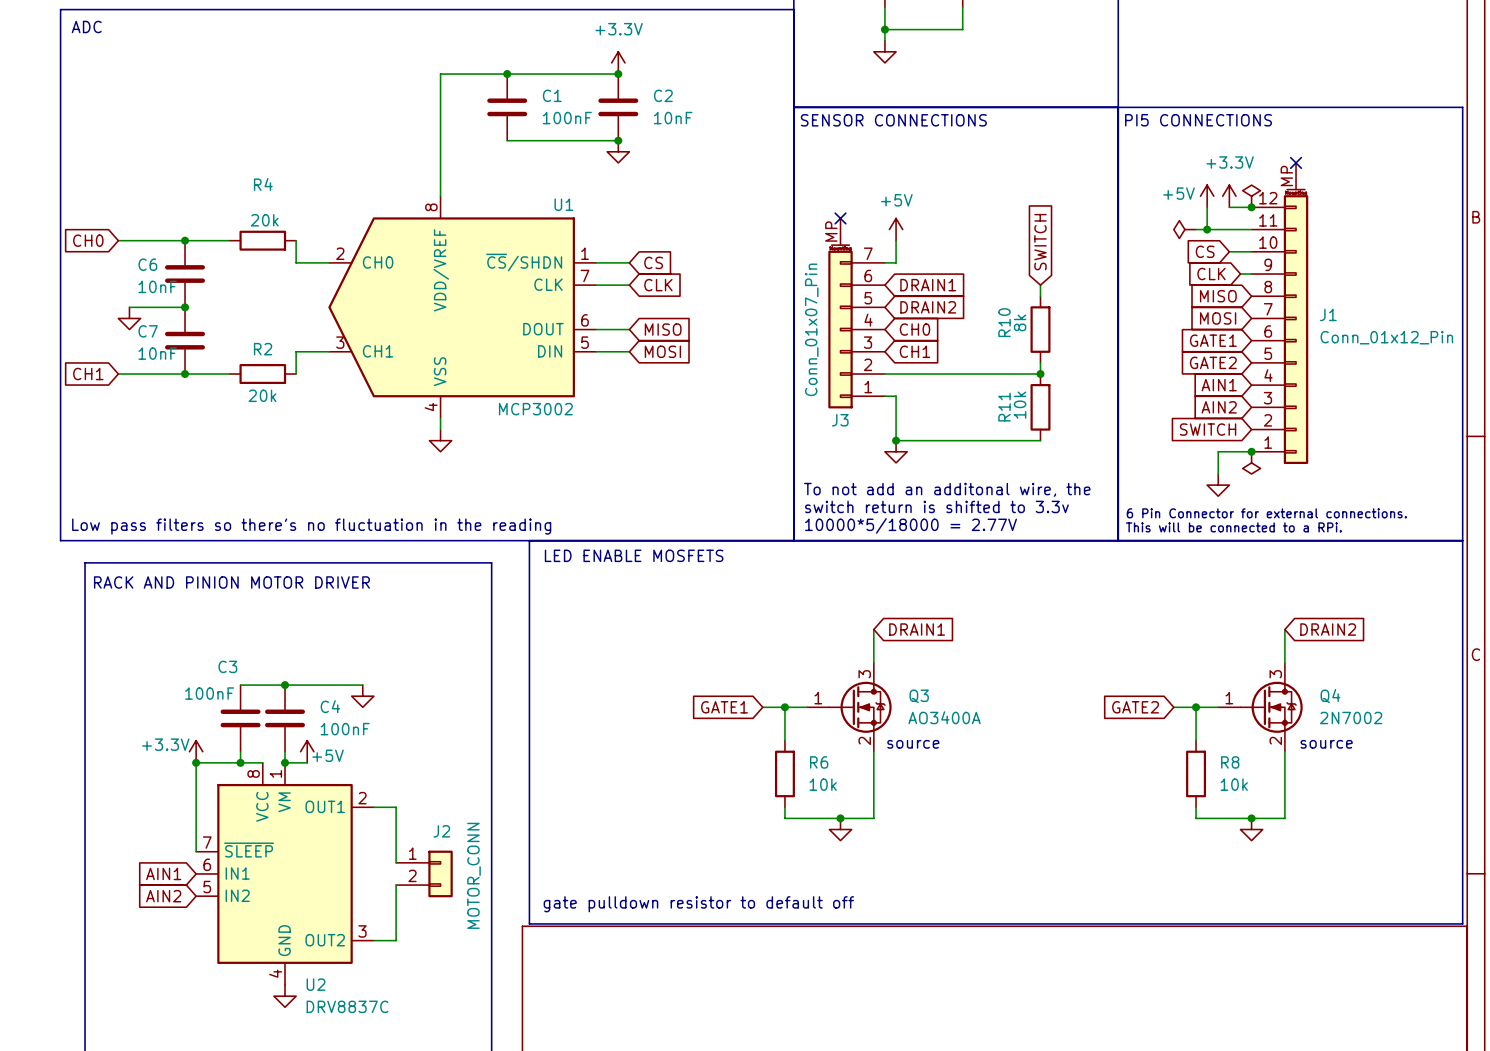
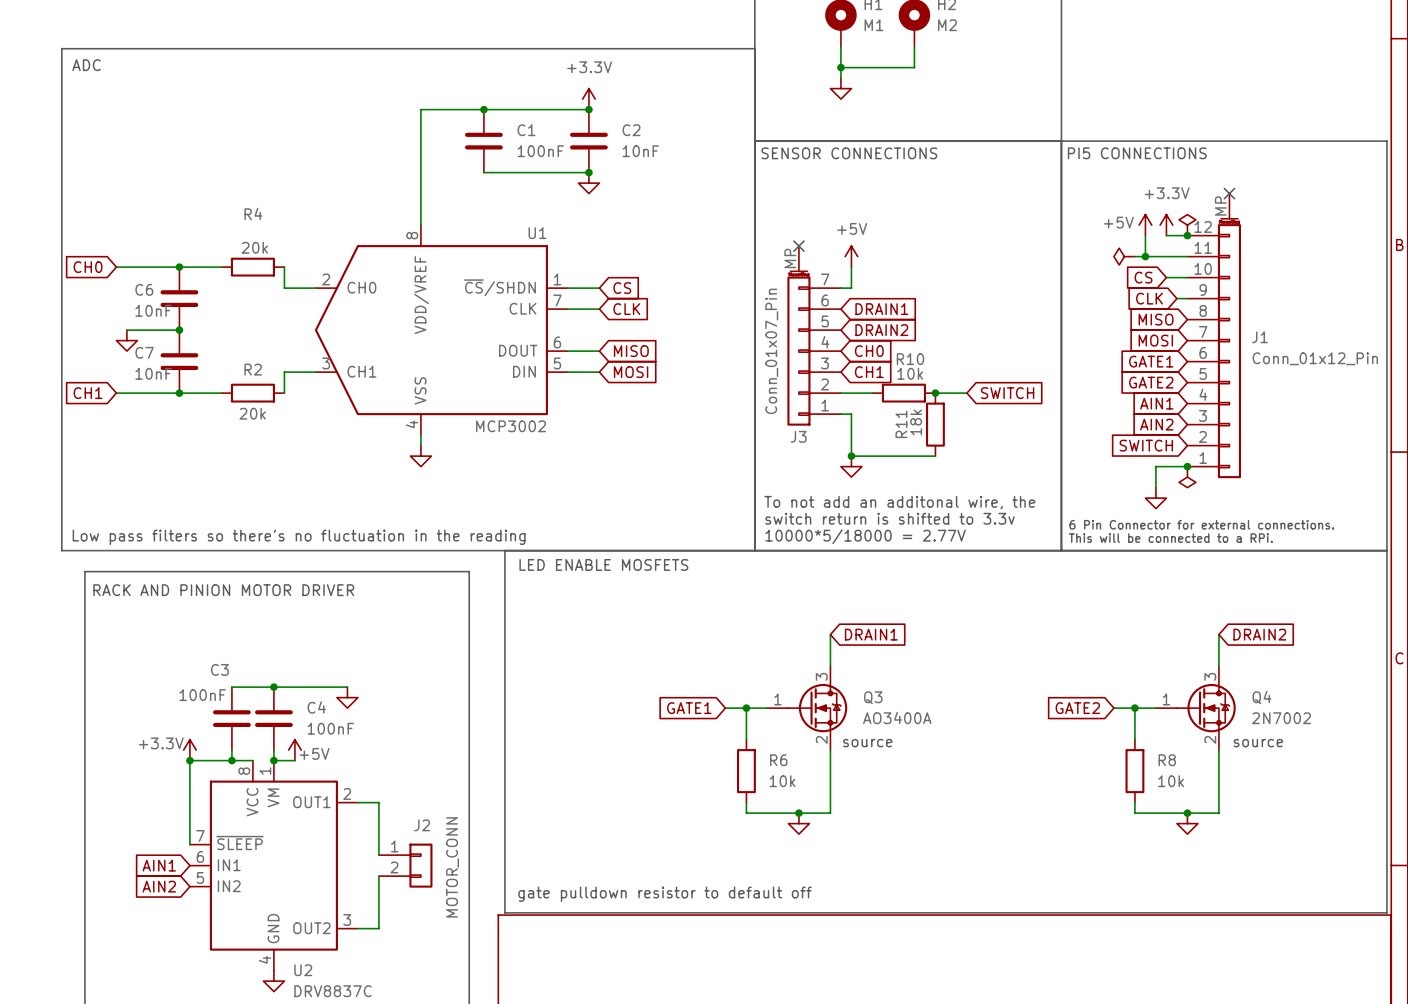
global label rotation: 0° (1040, 242) -> 90° clockwise (1007, 393)
global label position: SWITCH (1040, 242) -> SWITCH (1007, 393)
wire: (1040, 285) (1040, 296) -> none
R10 value: 8k (1020, 322) -> 10k (910, 373)
R10 rotation: 0° (1040, 329) -> 90° clockwise (903, 393)
R10 position: (1040, 329) -> (903, 393)
wire: (1040, 362) (1040, 374) (1018, 374) -> none
wire: (918, 374) (984, 374) -> none
junction: none -> (935, 393)
junction: (1040, 374) -> none
R11 value: 10k (1020, 405) -> 18k (916, 422)
R11 position: (1040, 407) -> (935, 424)
wire: (984, 440) (1040, 440) -> none

